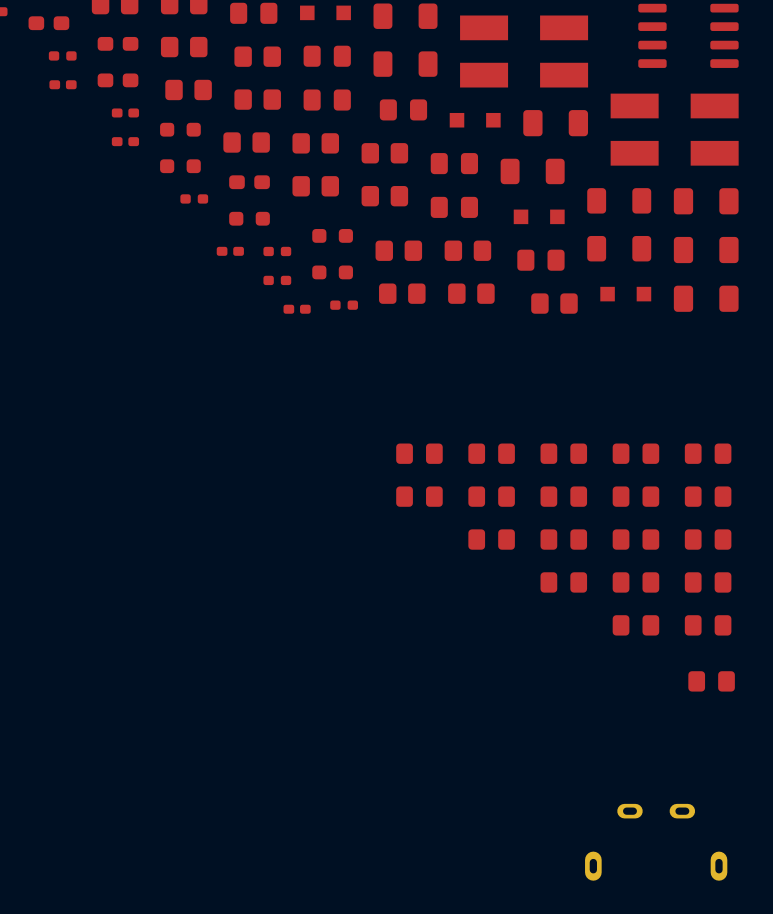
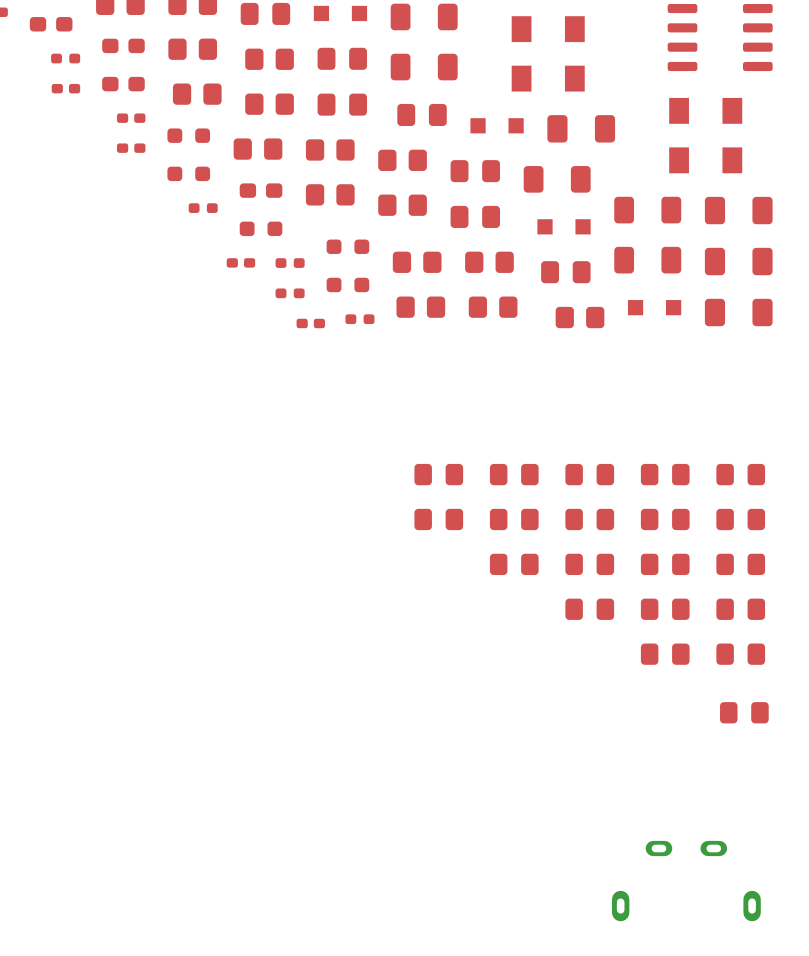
part footprint: [460, 15, 589, 41] -> [511, 16, 585, 43]
part footprint: [460, 62, 589, 88] -> [511, 65, 585, 92]
part footprint: [610, 93, 739, 119] -> [669, 97, 743, 124]
part footprint: [610, 140, 739, 166] -> [669, 147, 743, 174]

